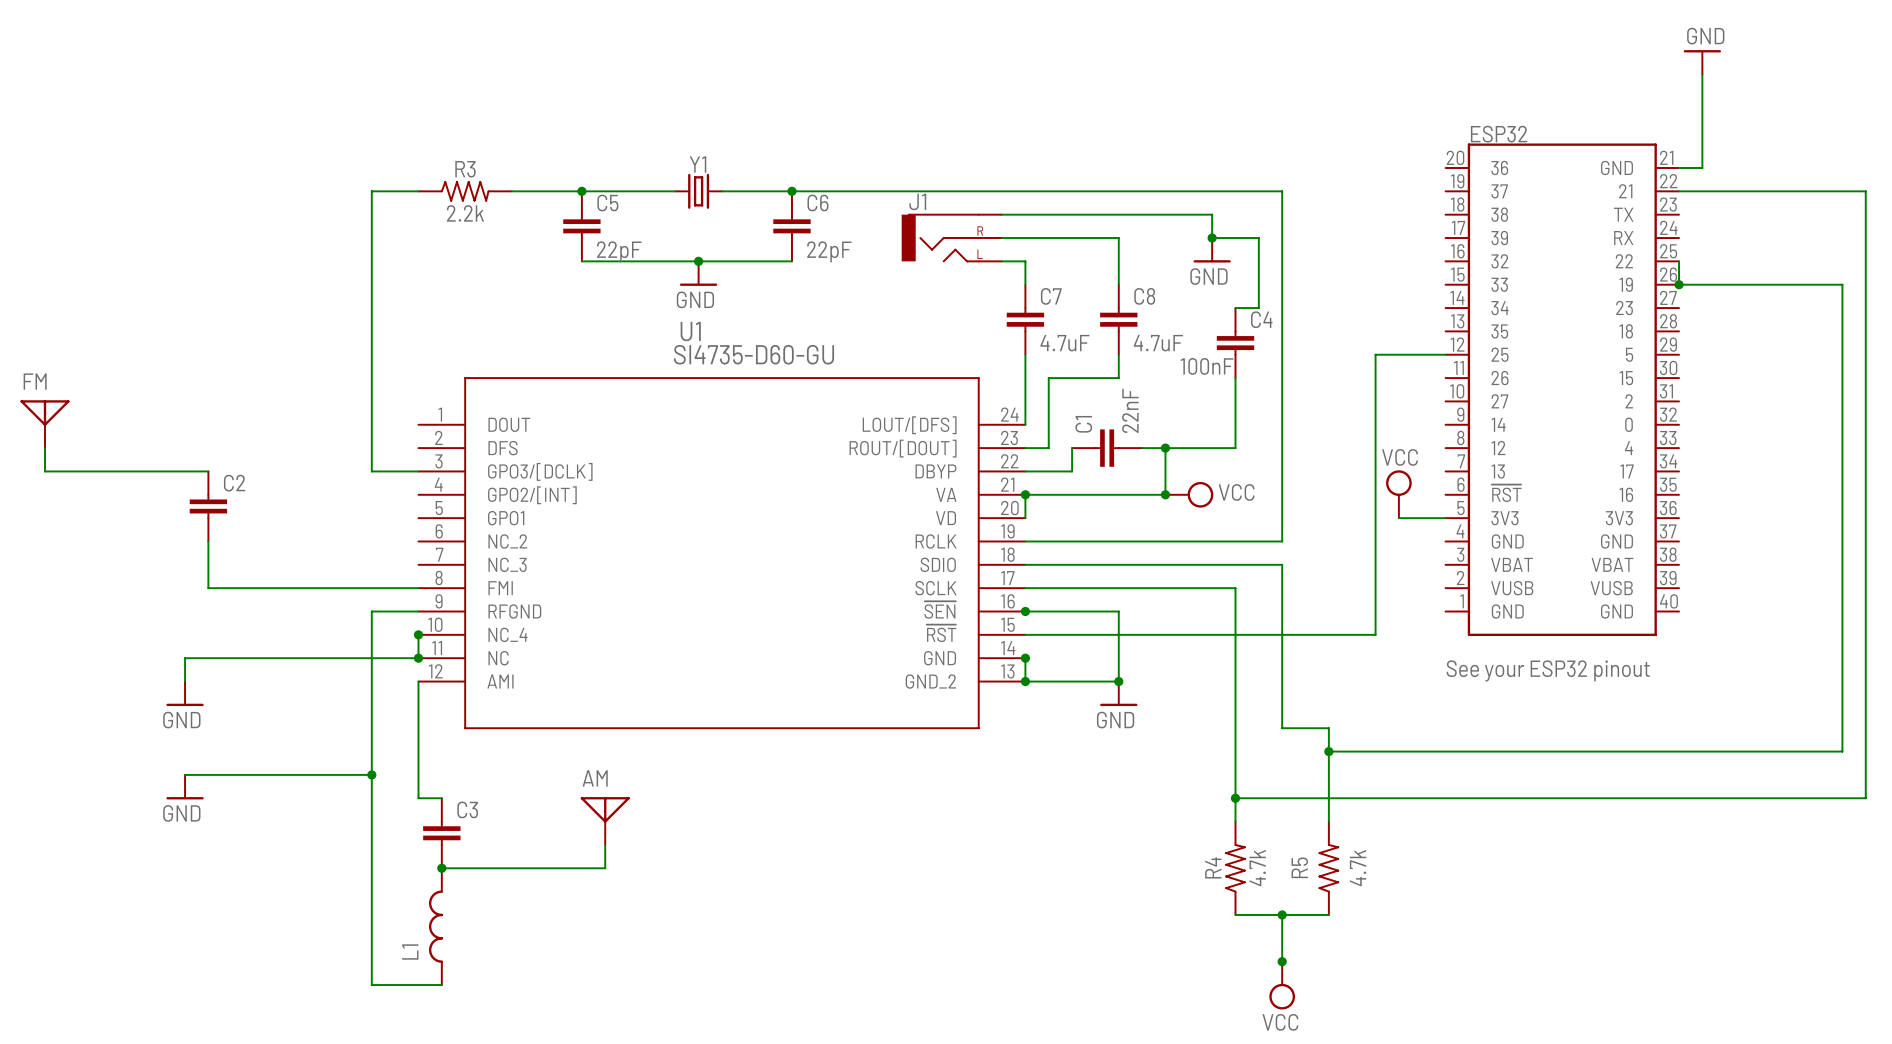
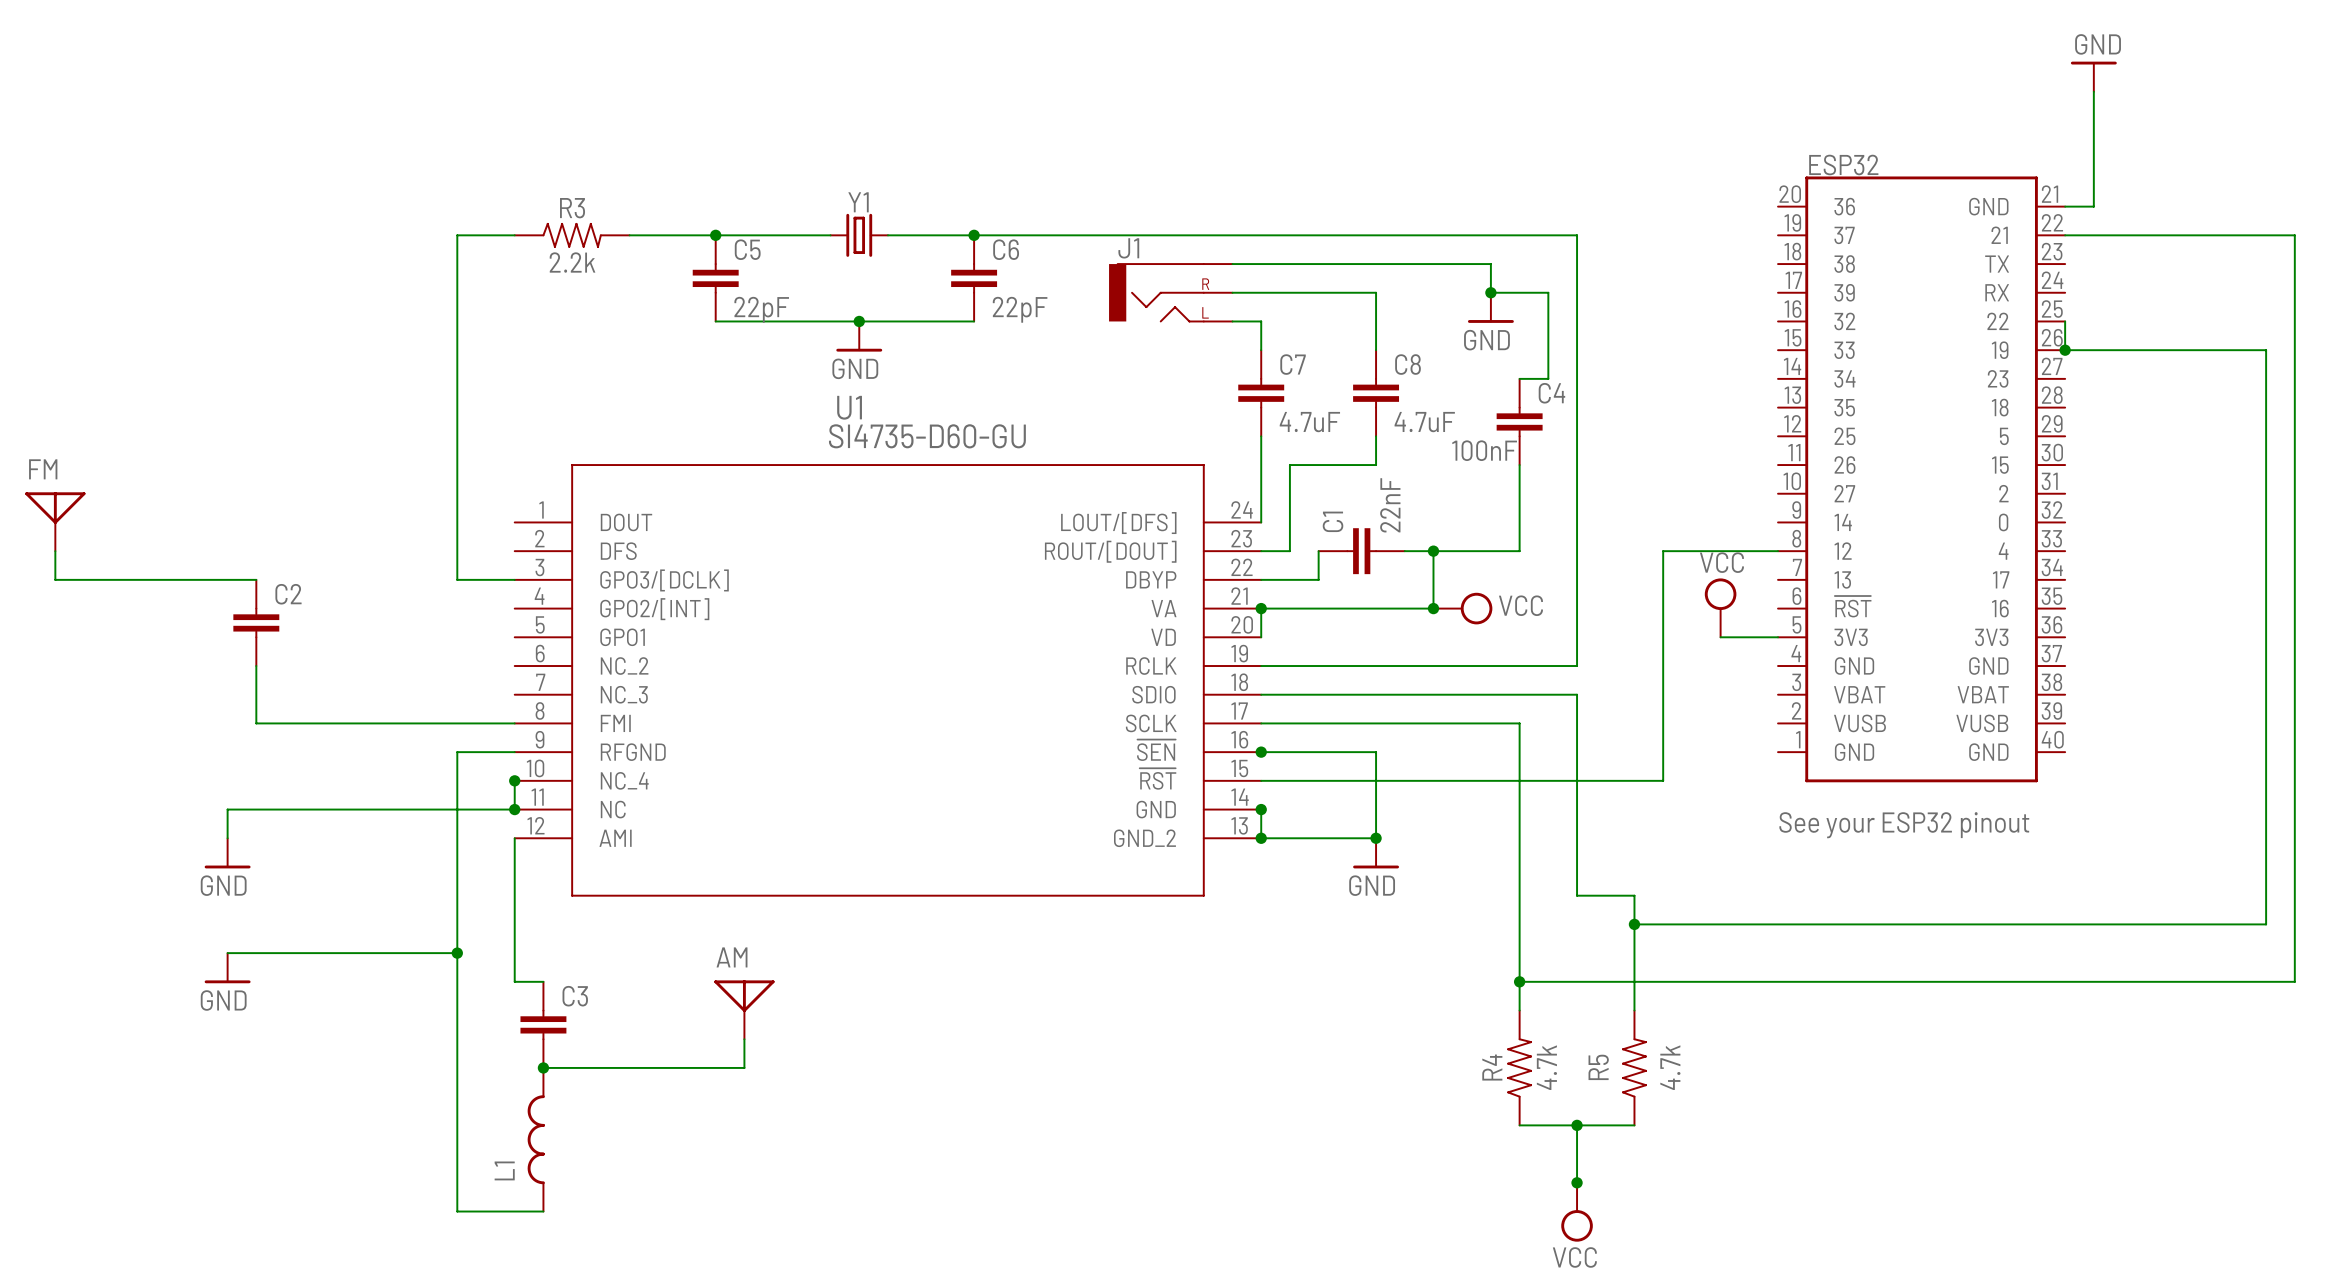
wire: (1445, 354) (1375, 354) (1375, 634) (1352, 634) -> (1778, 551) (1663, 551) (1663, 780)

